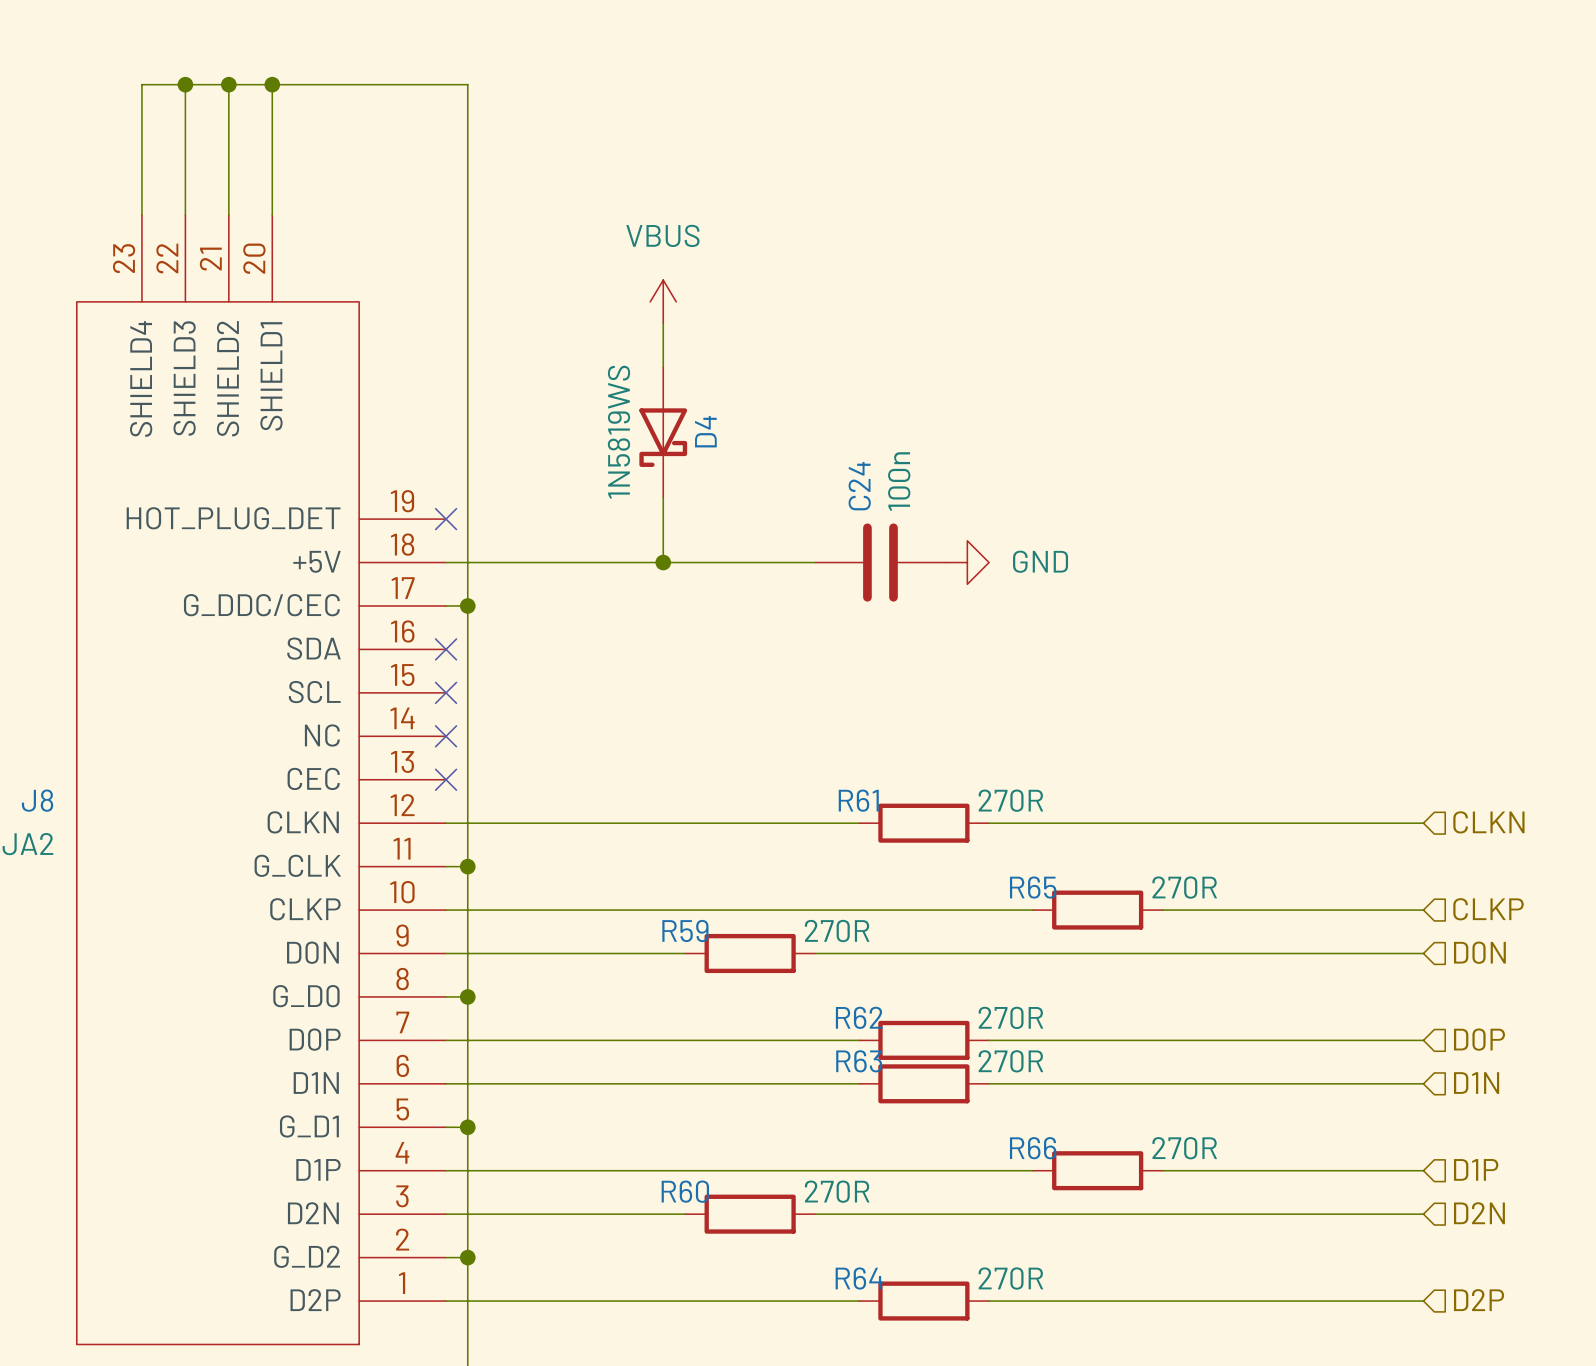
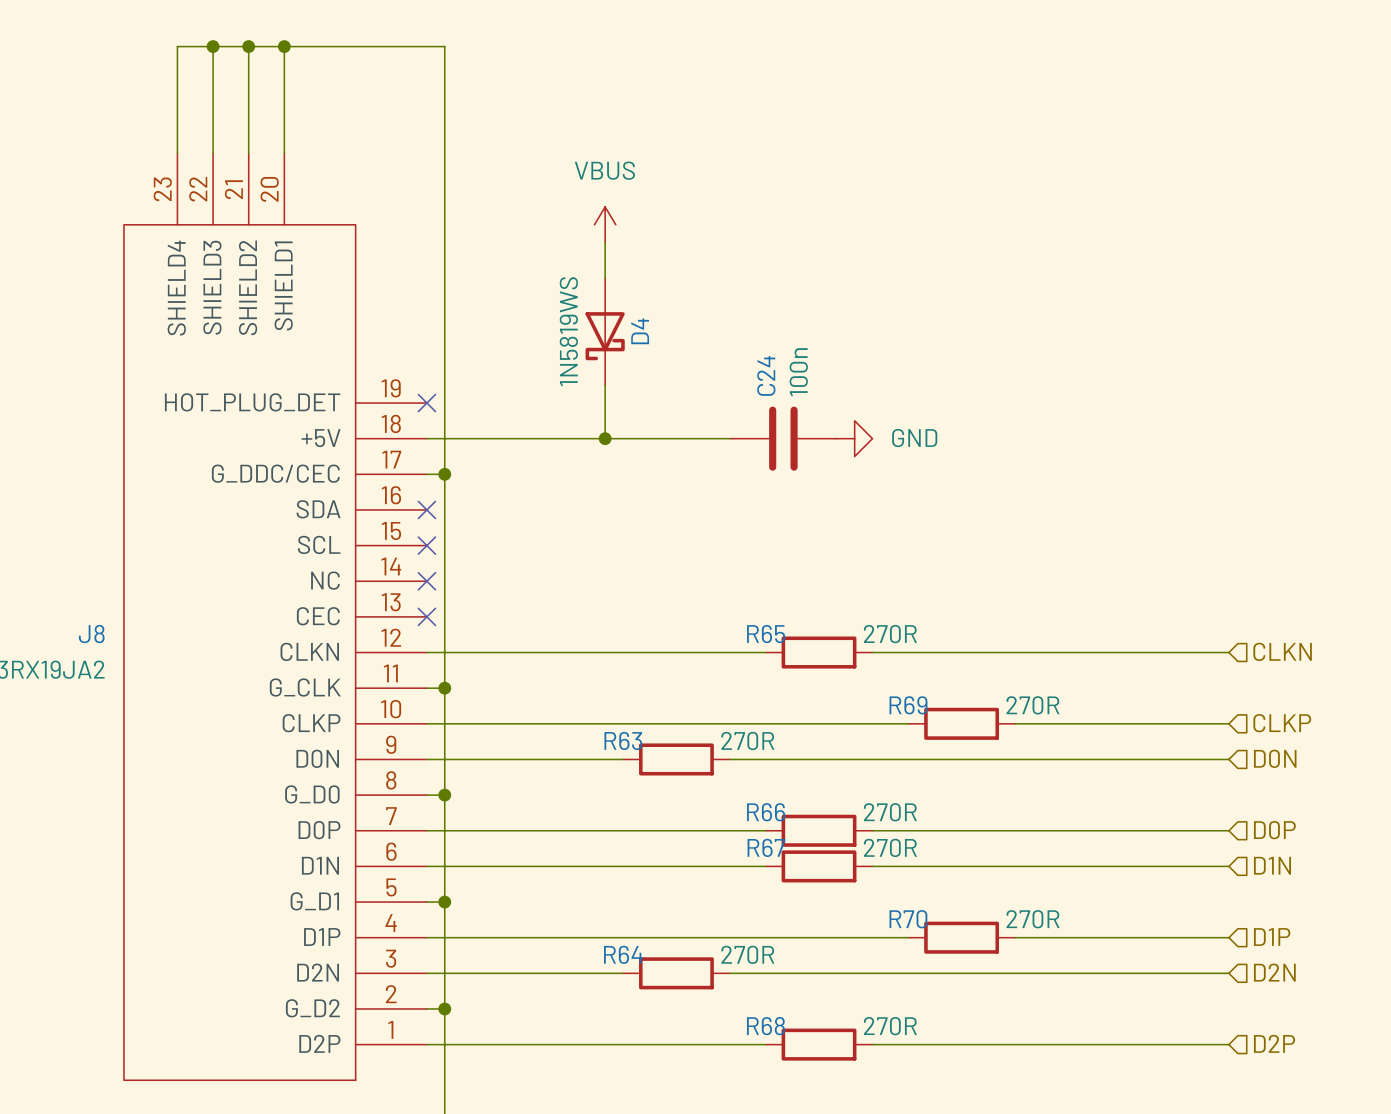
R61 name: R61 (858, 800) -> R65 (766, 634)
R65 name: R65 (1033, 887) -> R69 (908, 705)
R59 name: R59 (685, 930) -> R63 (623, 740)
R62 name: R62 (859, 1017) -> R66 (766, 812)
R63 name: R63 (859, 1061) -> R67 (766, 847)
R66 name: R66 (1033, 1148) -> R70 (908, 919)
R60 name: R60 (685, 1191) -> R64 (623, 954)
R64 name: R64 (859, 1278) -> R68 (765, 1026)

